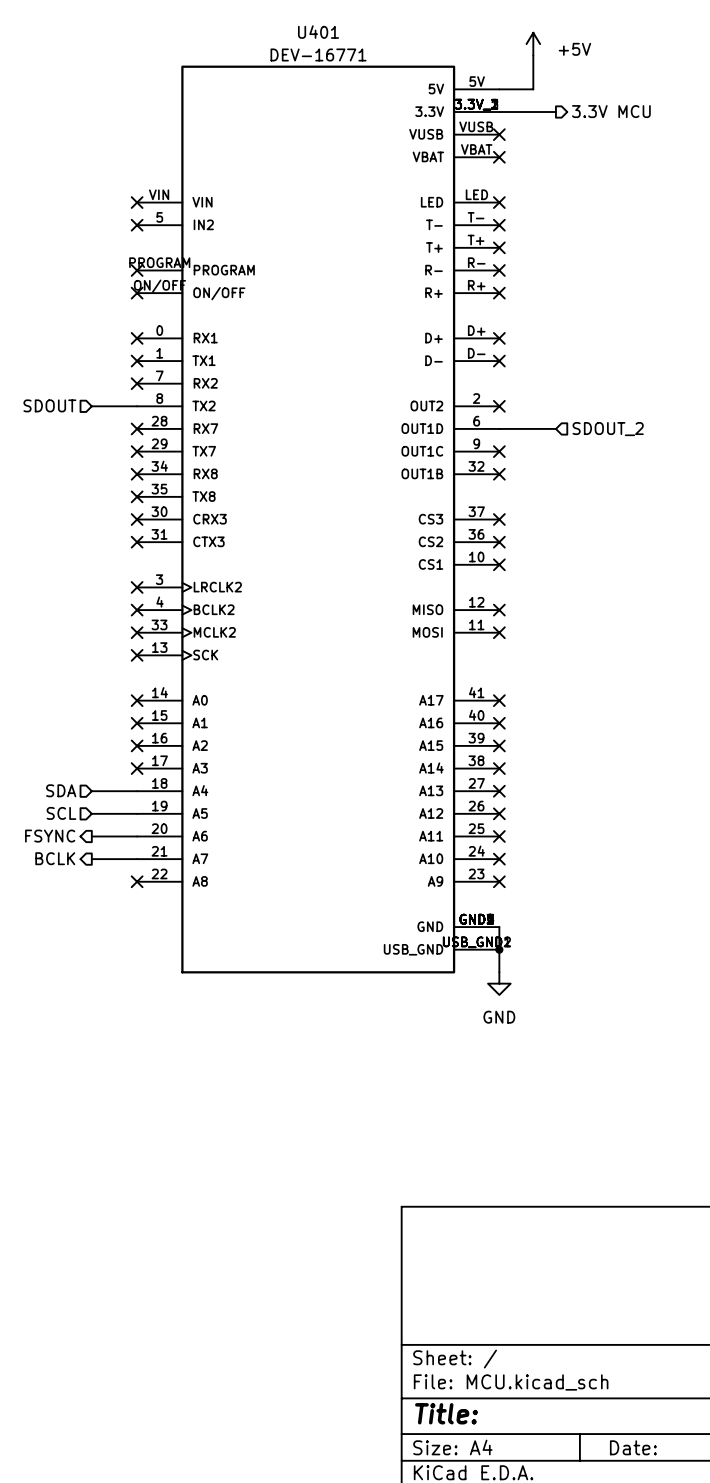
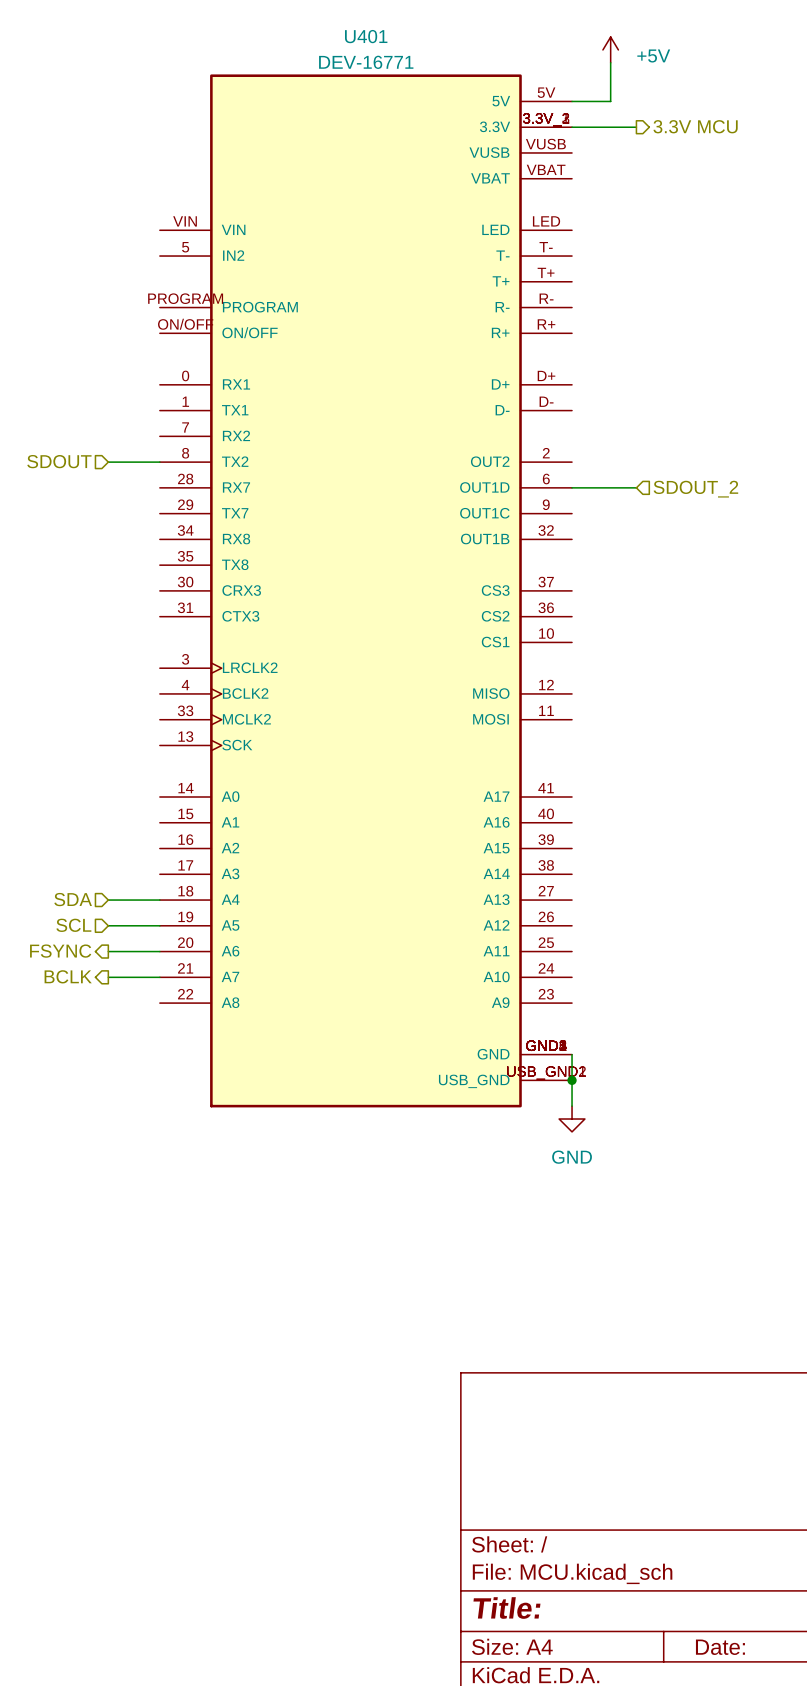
no-connect mark: (499, 134) -> none
no-connect mark: (499, 157) -> none
no-connect mark: (137, 202) -> none
no-connect mark: (499, 202) -> none
no-connect mark: (137, 225) -> none
no-connect mark: (499, 225) -> none
no-connect mark: (499, 247) -> none
no-connect mark: (137, 270) -> none
no-connect mark: (499, 270) -> none
no-connect mark: (137, 293) -> none
no-connect mark: (499, 293) -> none
no-connect mark: (137, 338) -> none
no-connect mark: (499, 338) -> none
no-connect mark: (137, 361) -> none
no-connect mark: (499, 361) -> none
no-connect mark: (137, 383) -> none
no-connect mark: (499, 406) -> none
no-connect mark: (137, 428) -> none
no-connect mark: (137, 451) -> none
no-connect mark: (499, 451) -> none
no-connect mark: (137, 474) -> none
no-connect mark: (499, 474) -> none
no-connect mark: (137, 496) -> none
no-connect mark: (137, 519) -> none
no-connect mark: (499, 519) -> none
no-connect mark: (137, 542) -> none
no-connect mark: (499, 542) -> none
no-connect mark: (499, 564) -> none
no-connect mark: (137, 587) -> none
no-connect mark: (137, 610) -> none
no-connect mark: (499, 610) -> none
no-connect mark: (137, 632) -> none
no-connect mark: (499, 632) -> none
no-connect mark: (137, 655) -> none
no-connect mark: (137, 700) -> none
no-connect mark: (499, 700) -> none
no-connect mark: (137, 723) -> none
no-connect mark: (499, 723) -> none
no-connect mark: (137, 745) -> none
no-connect mark: (499, 745) -> none
no-connect mark: (137, 768) -> none
no-connect mark: (499, 768) -> none
no-connect mark: (499, 791) -> none
no-connect mark: (499, 813) -> none
no-connect mark: (499, 836) -> none
no-connect mark: (499, 859) -> none
no-connect mark: (137, 881) -> none
no-connect mark: (499, 881) -> none

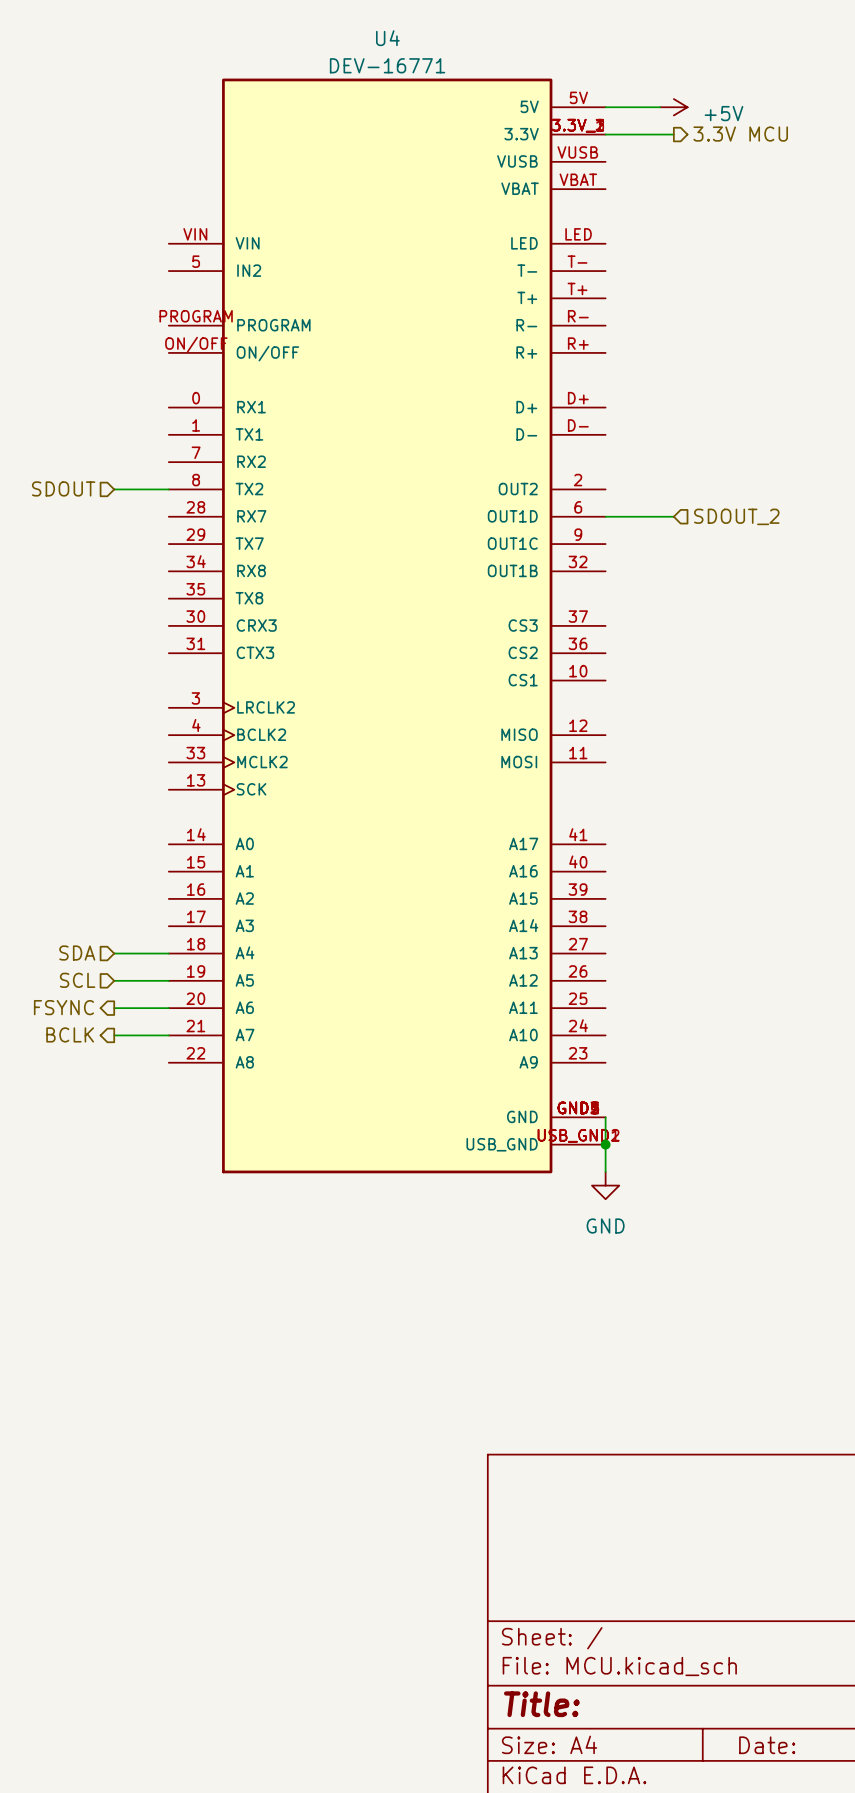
U401 name: U401 (366, 36) -> U4 (387, 38)
power symbol rotation: 0° (610, 49) -> 90° clockwise (673, 107)
power symbol position: +5V (610, 49) -> +5V (673, 107)
wire: (610, 62) (610, 101) -> (660, 107) (646, 107)

